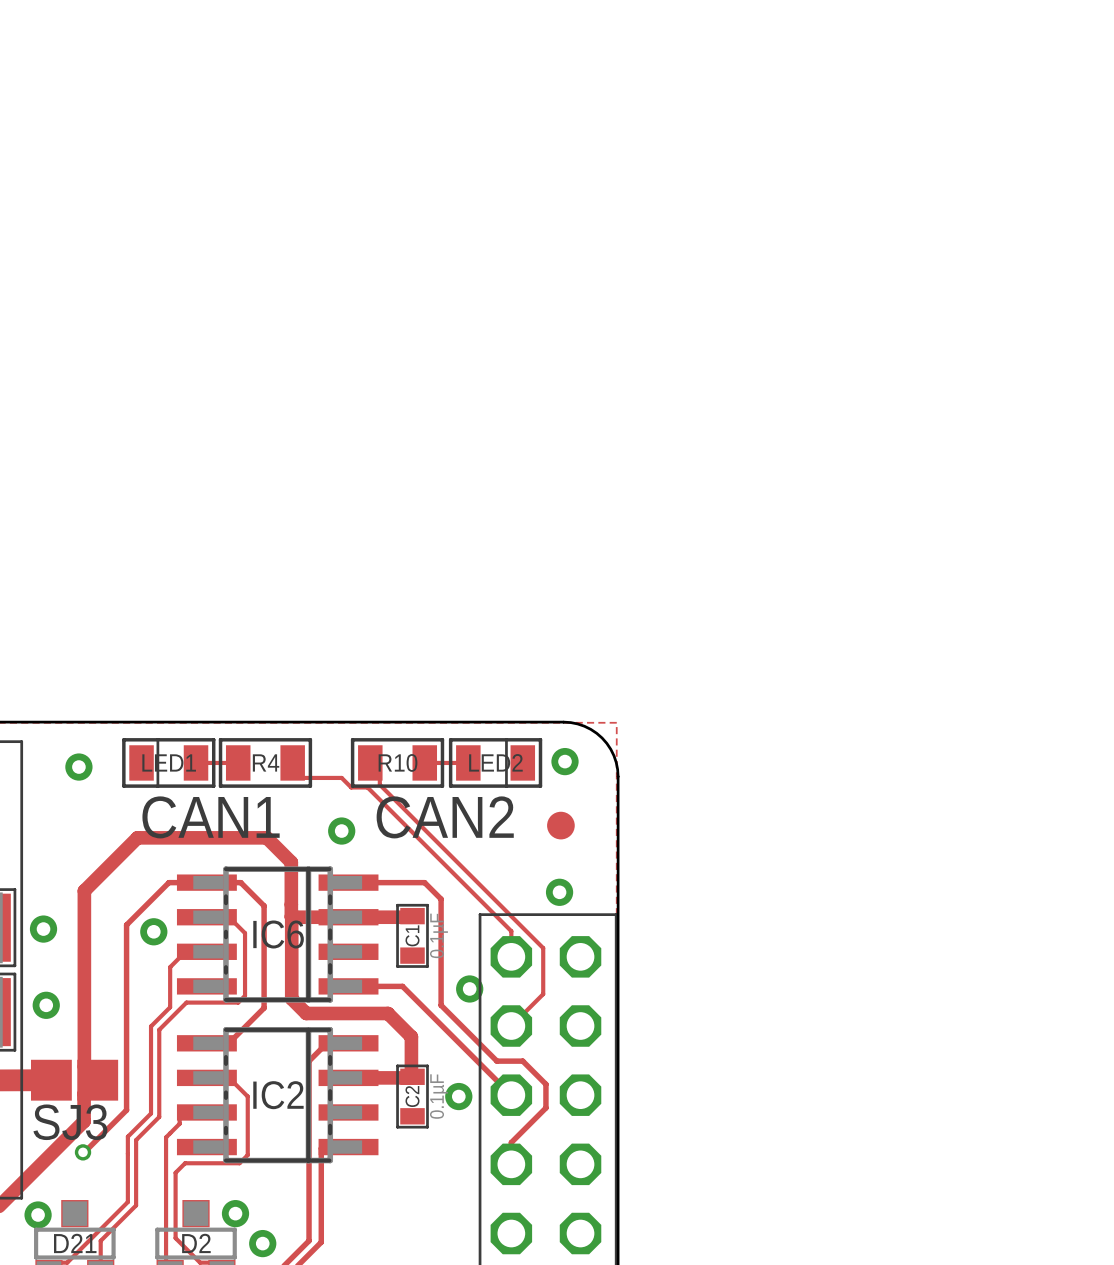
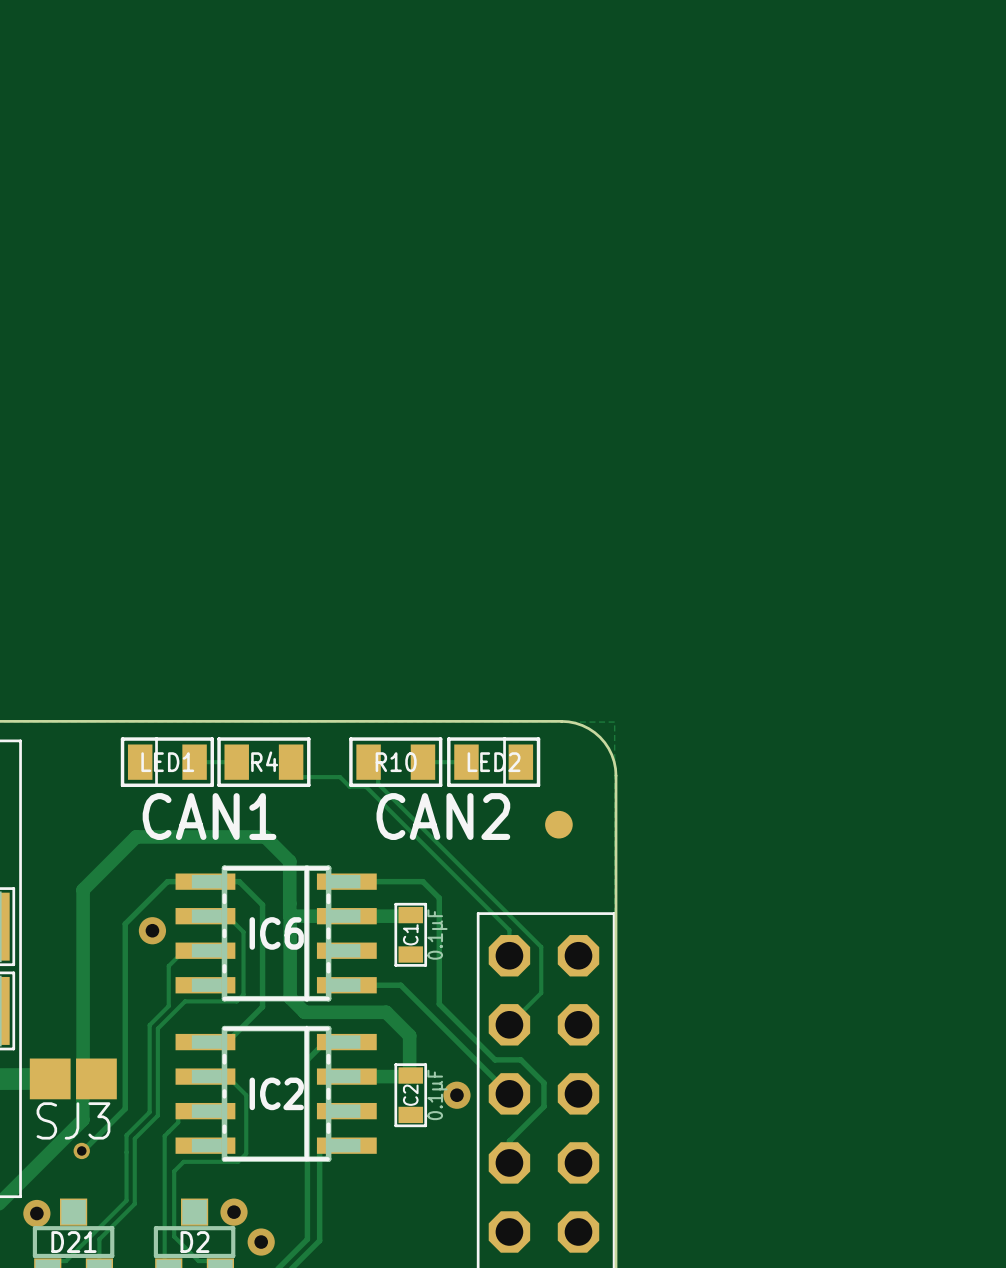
via: (565, 761) -> none
via: (78, 767) -> none
via: (341, 831) -> none
via: (559, 892) -> none
via: (43, 929) -> none
via: (469, 988) -> none
via: (46, 1005) -> none

